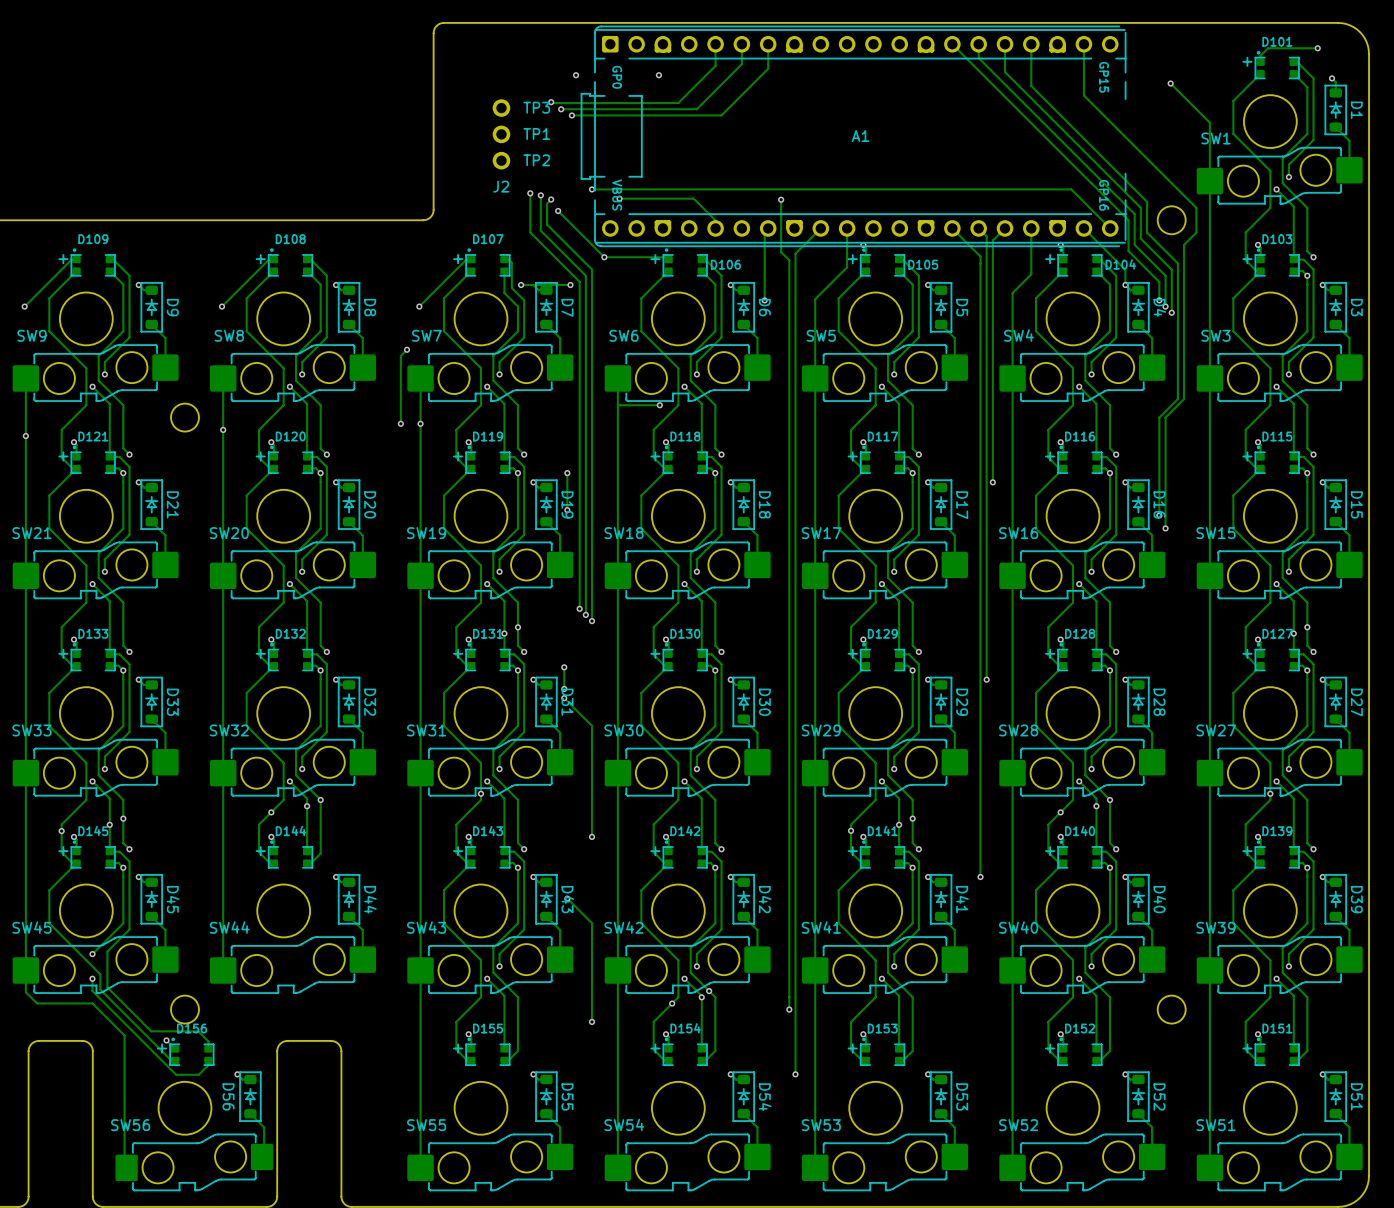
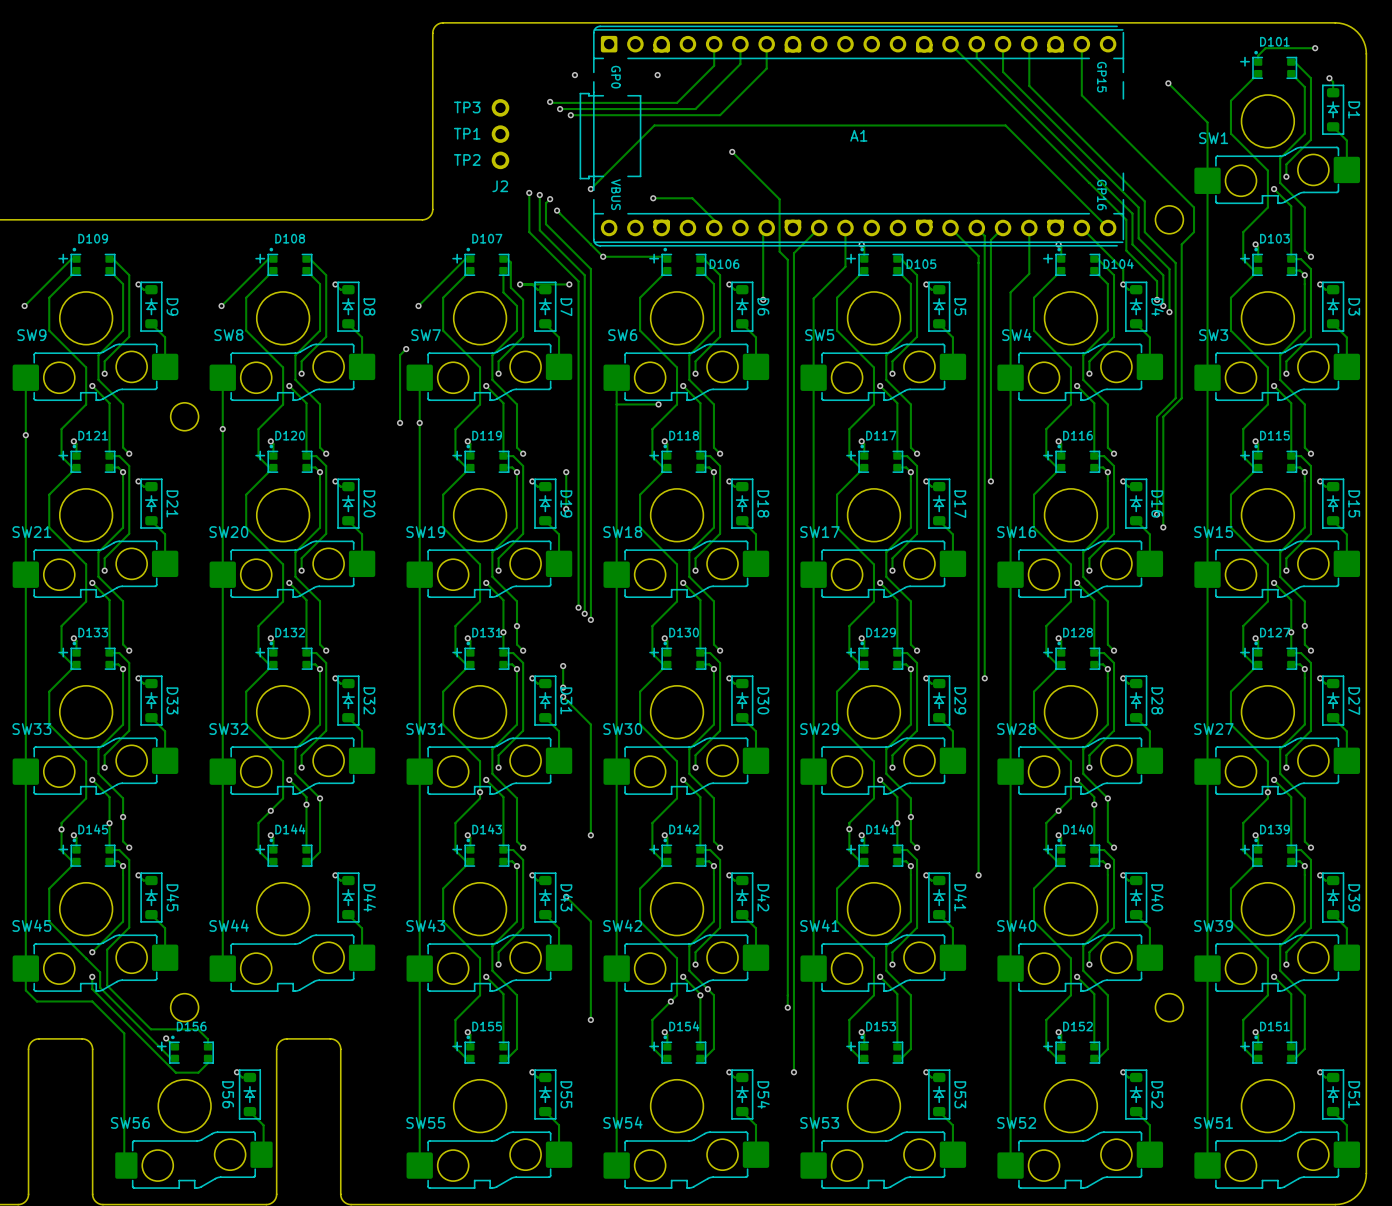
J2 text position: TP3 (536, 107) -> TP3 (467, 107)
J2 text position: TP1 (536, 133) -> TP1 (467, 133)
track: none -> (732, 151) (779, 199)
via: none -> (732, 151)
J2 text position: TP2 (536, 160) -> TP2 (467, 159)
track: (1071, 189) (592, 189) -> (1069, 189) (1005, 125) (654, 125) (590, 189)
via position: (619, 198) -> (653, 198)
track: (654, 198) (619, 198) -> none
via: (781, 199) -> none

